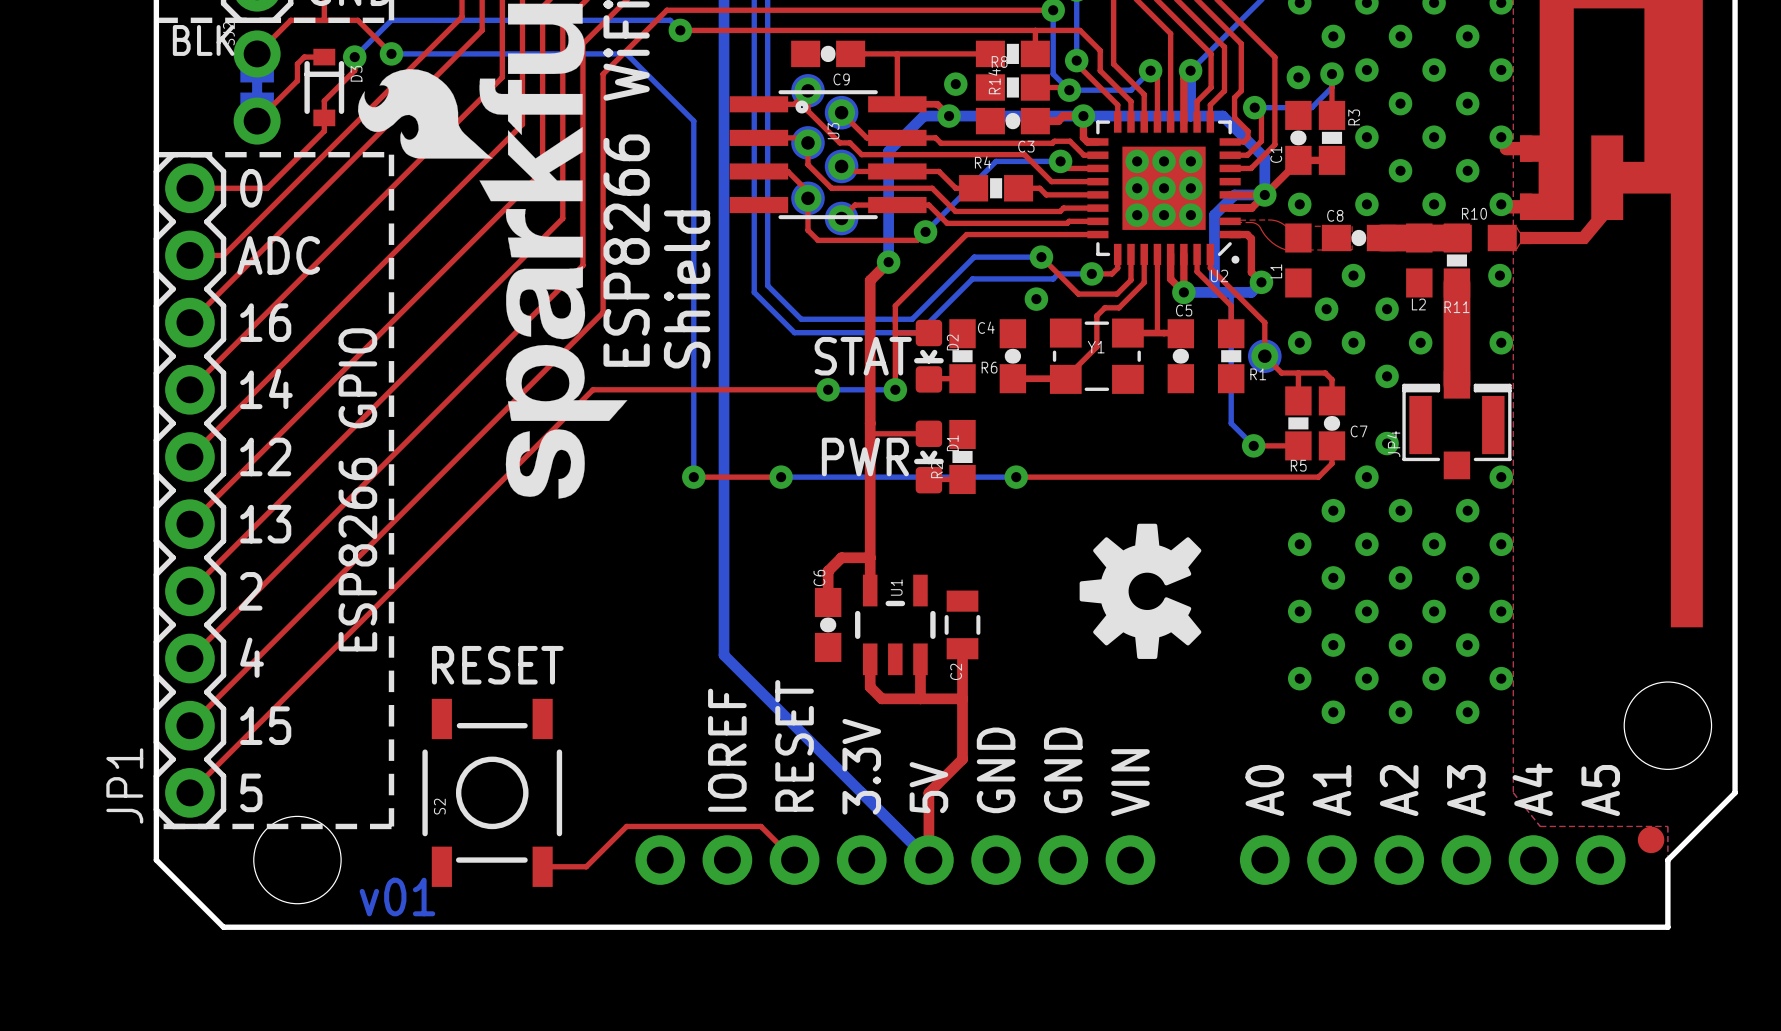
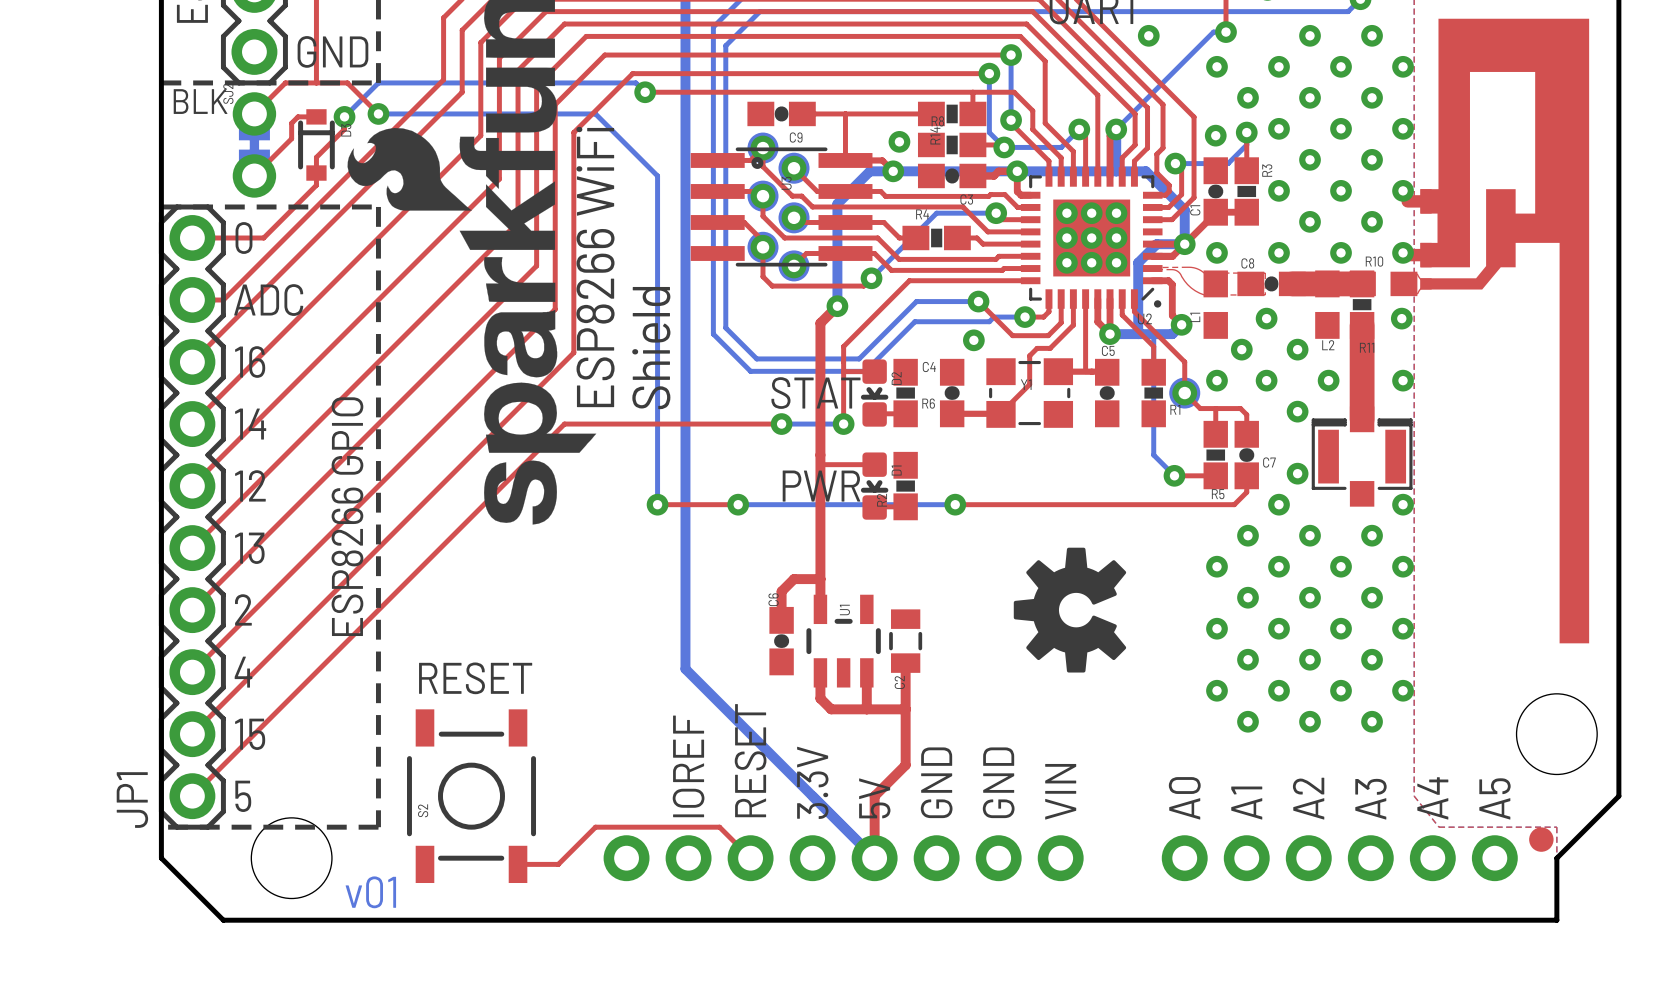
JP4 name: JP4 (1393, 444) -> none

